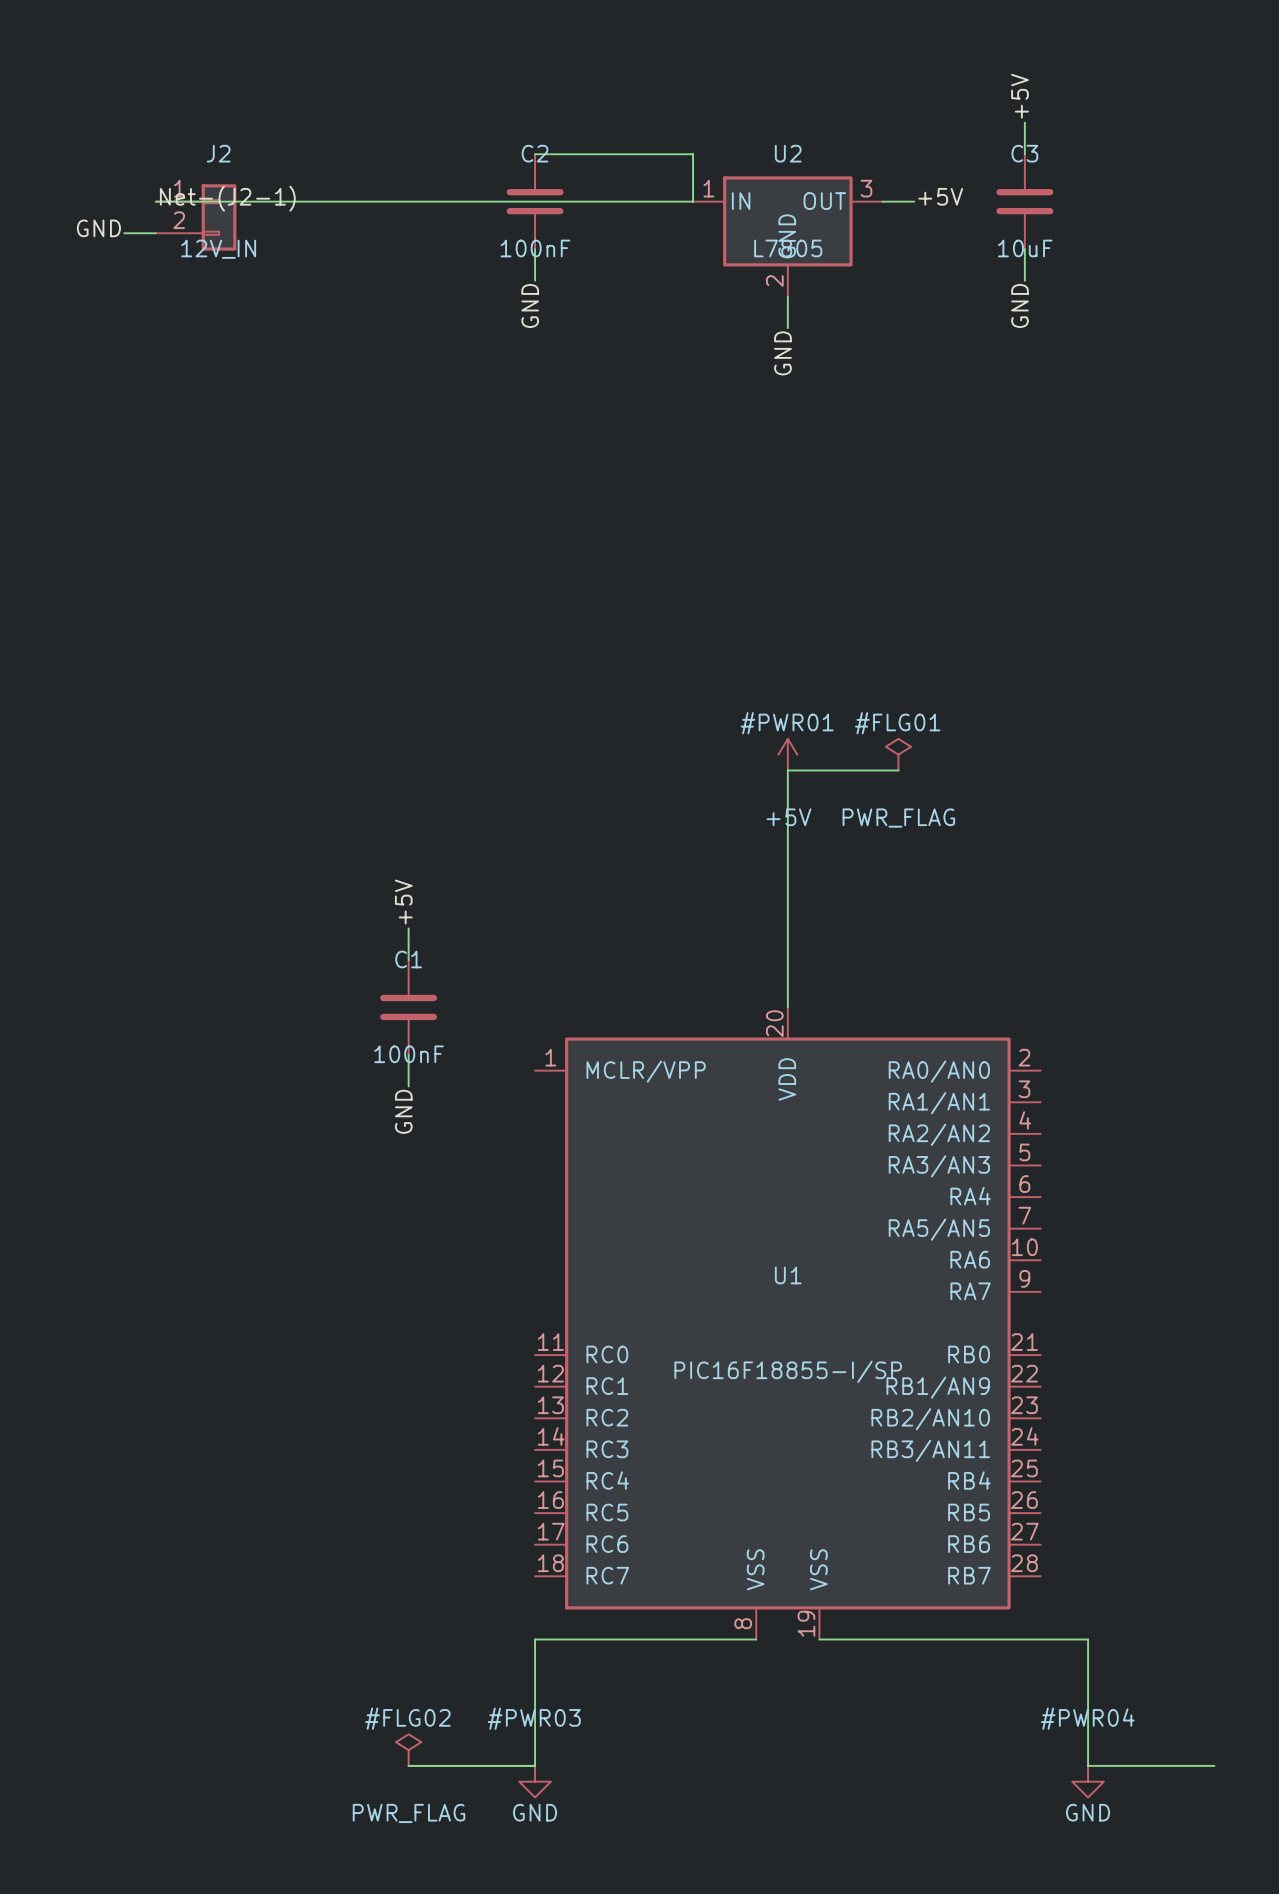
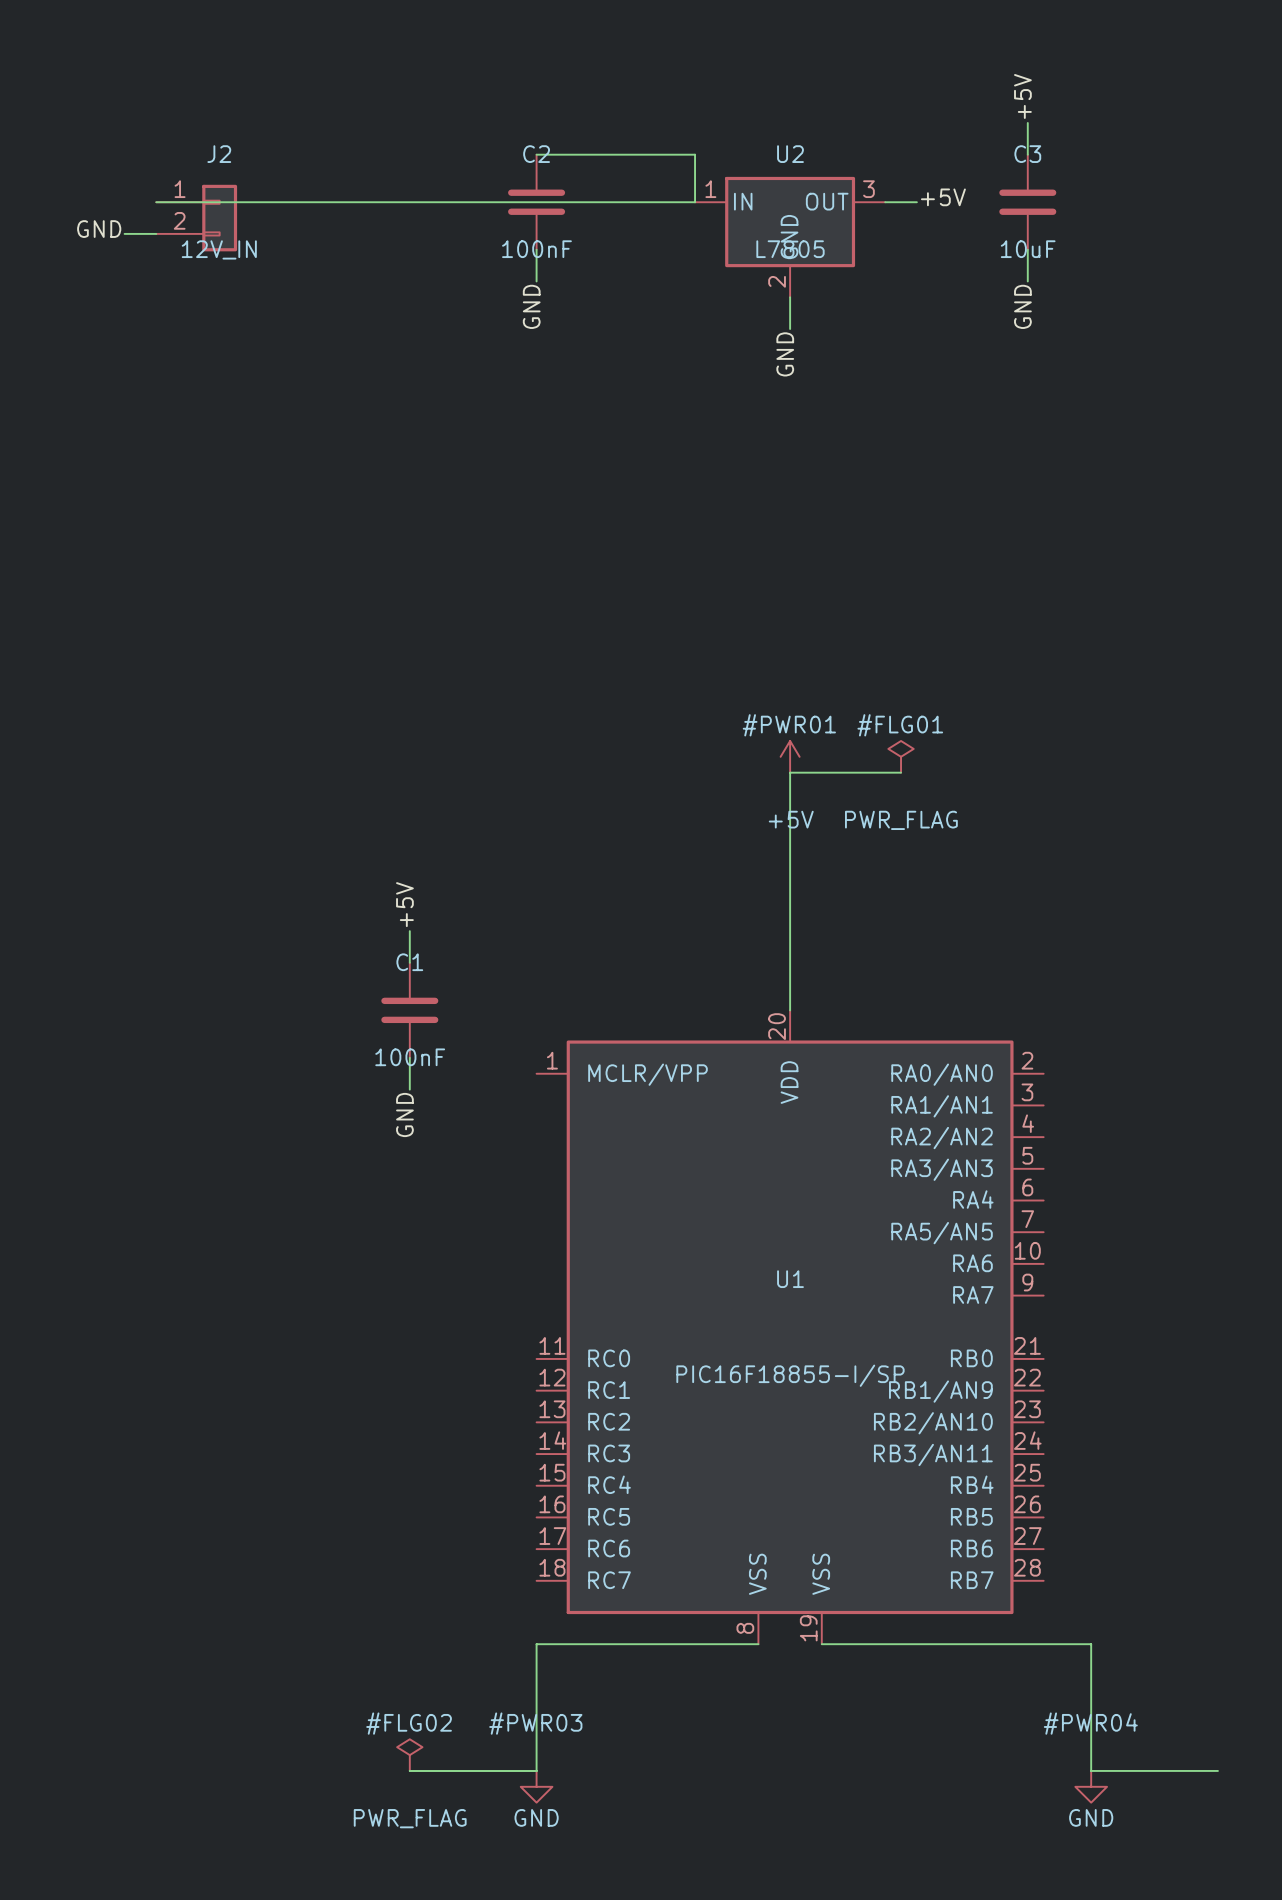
label: Net-(J2-1) (227, 198) -> none

